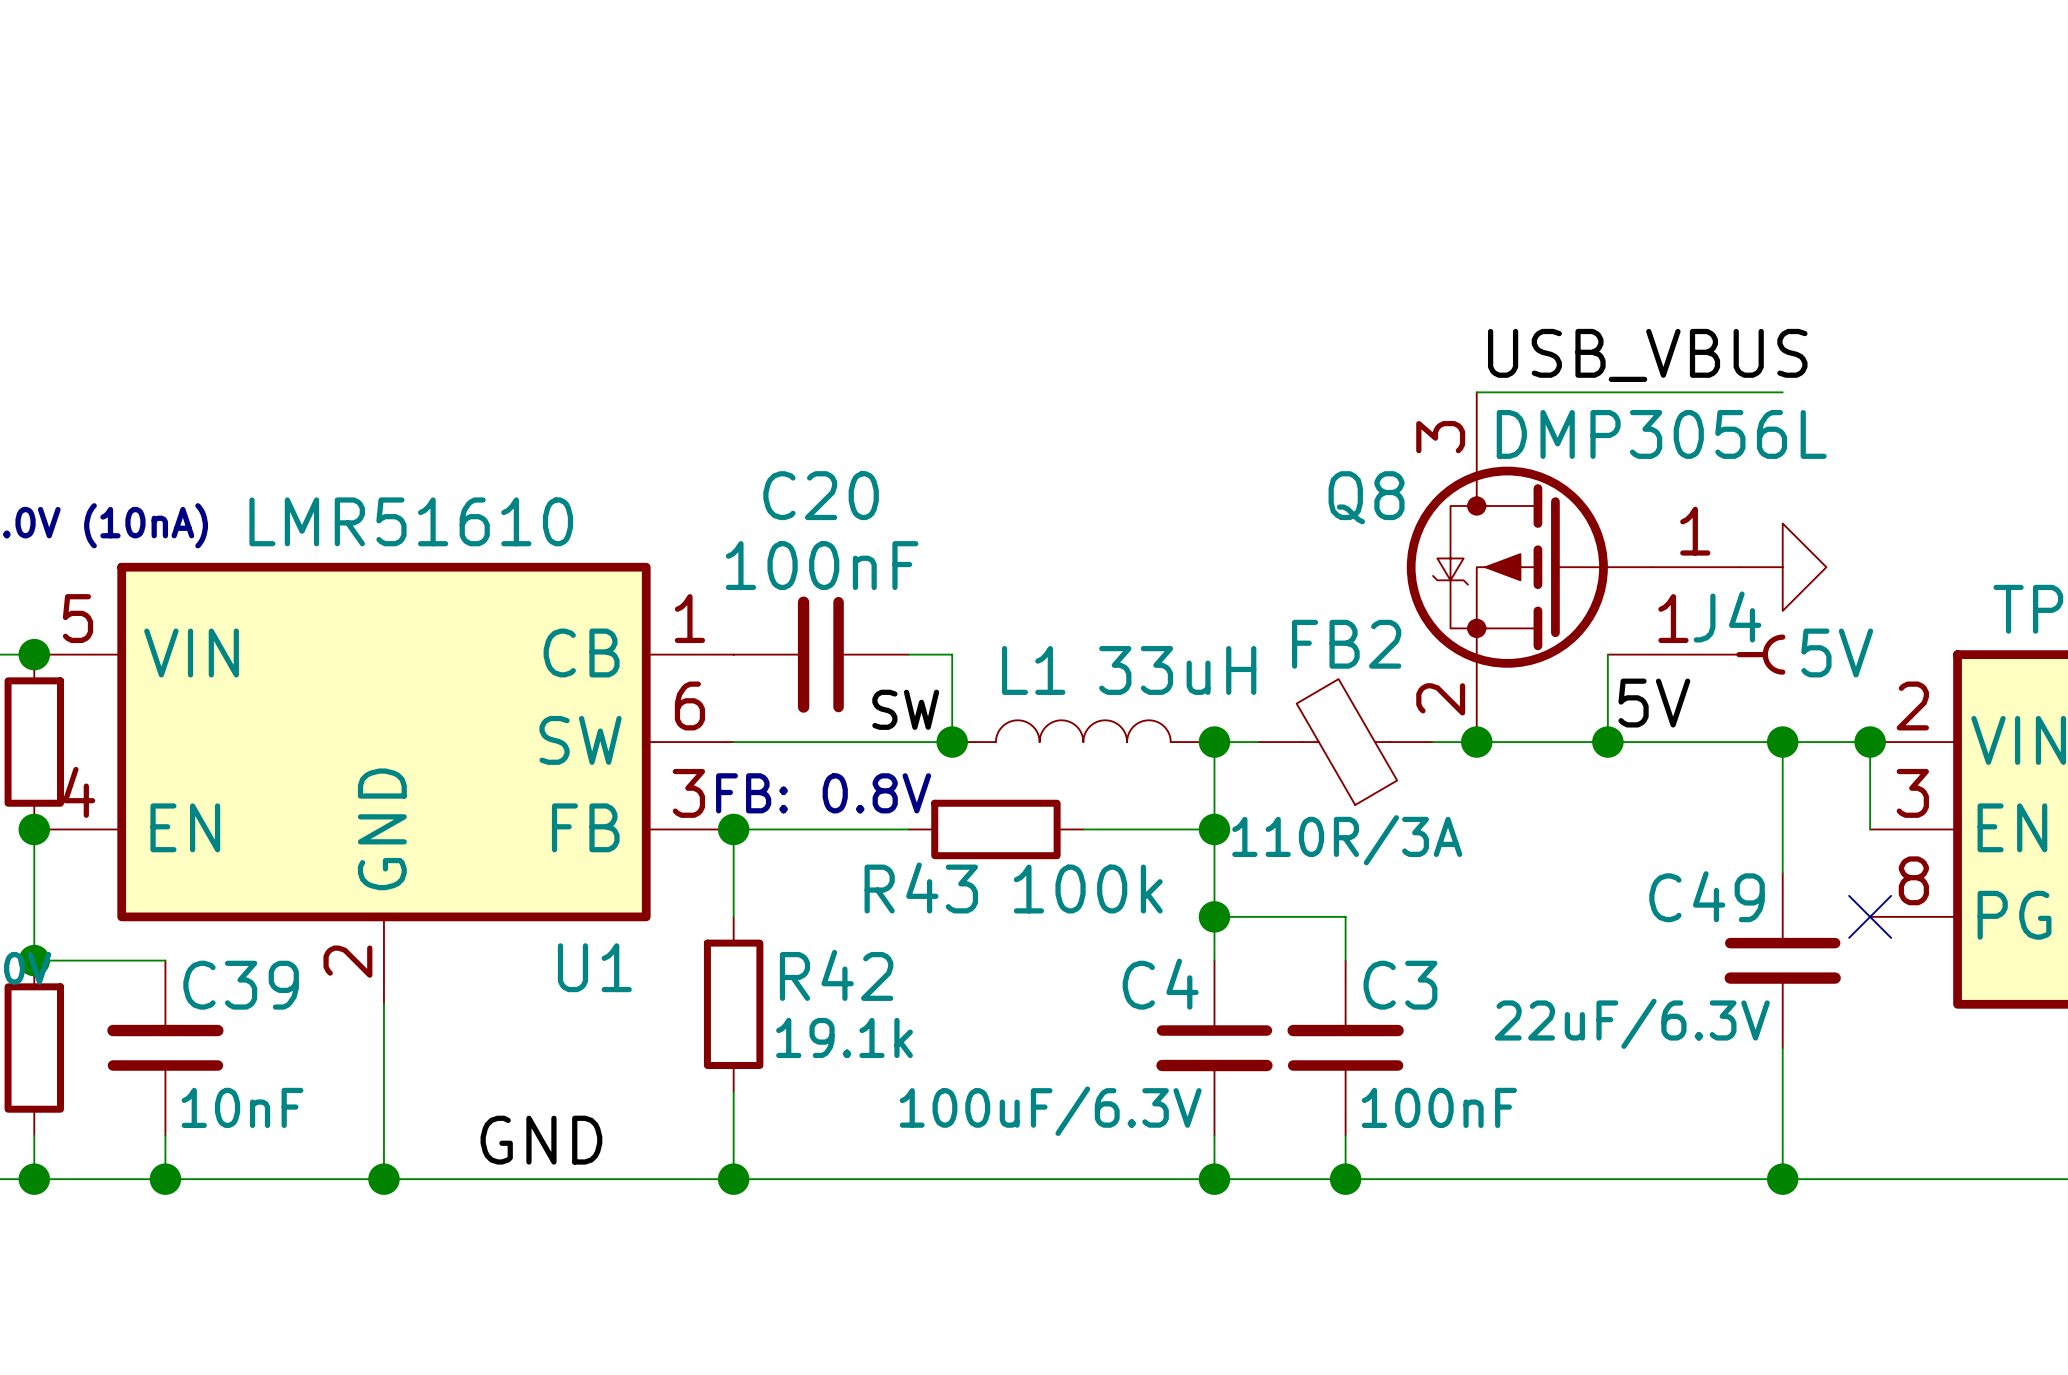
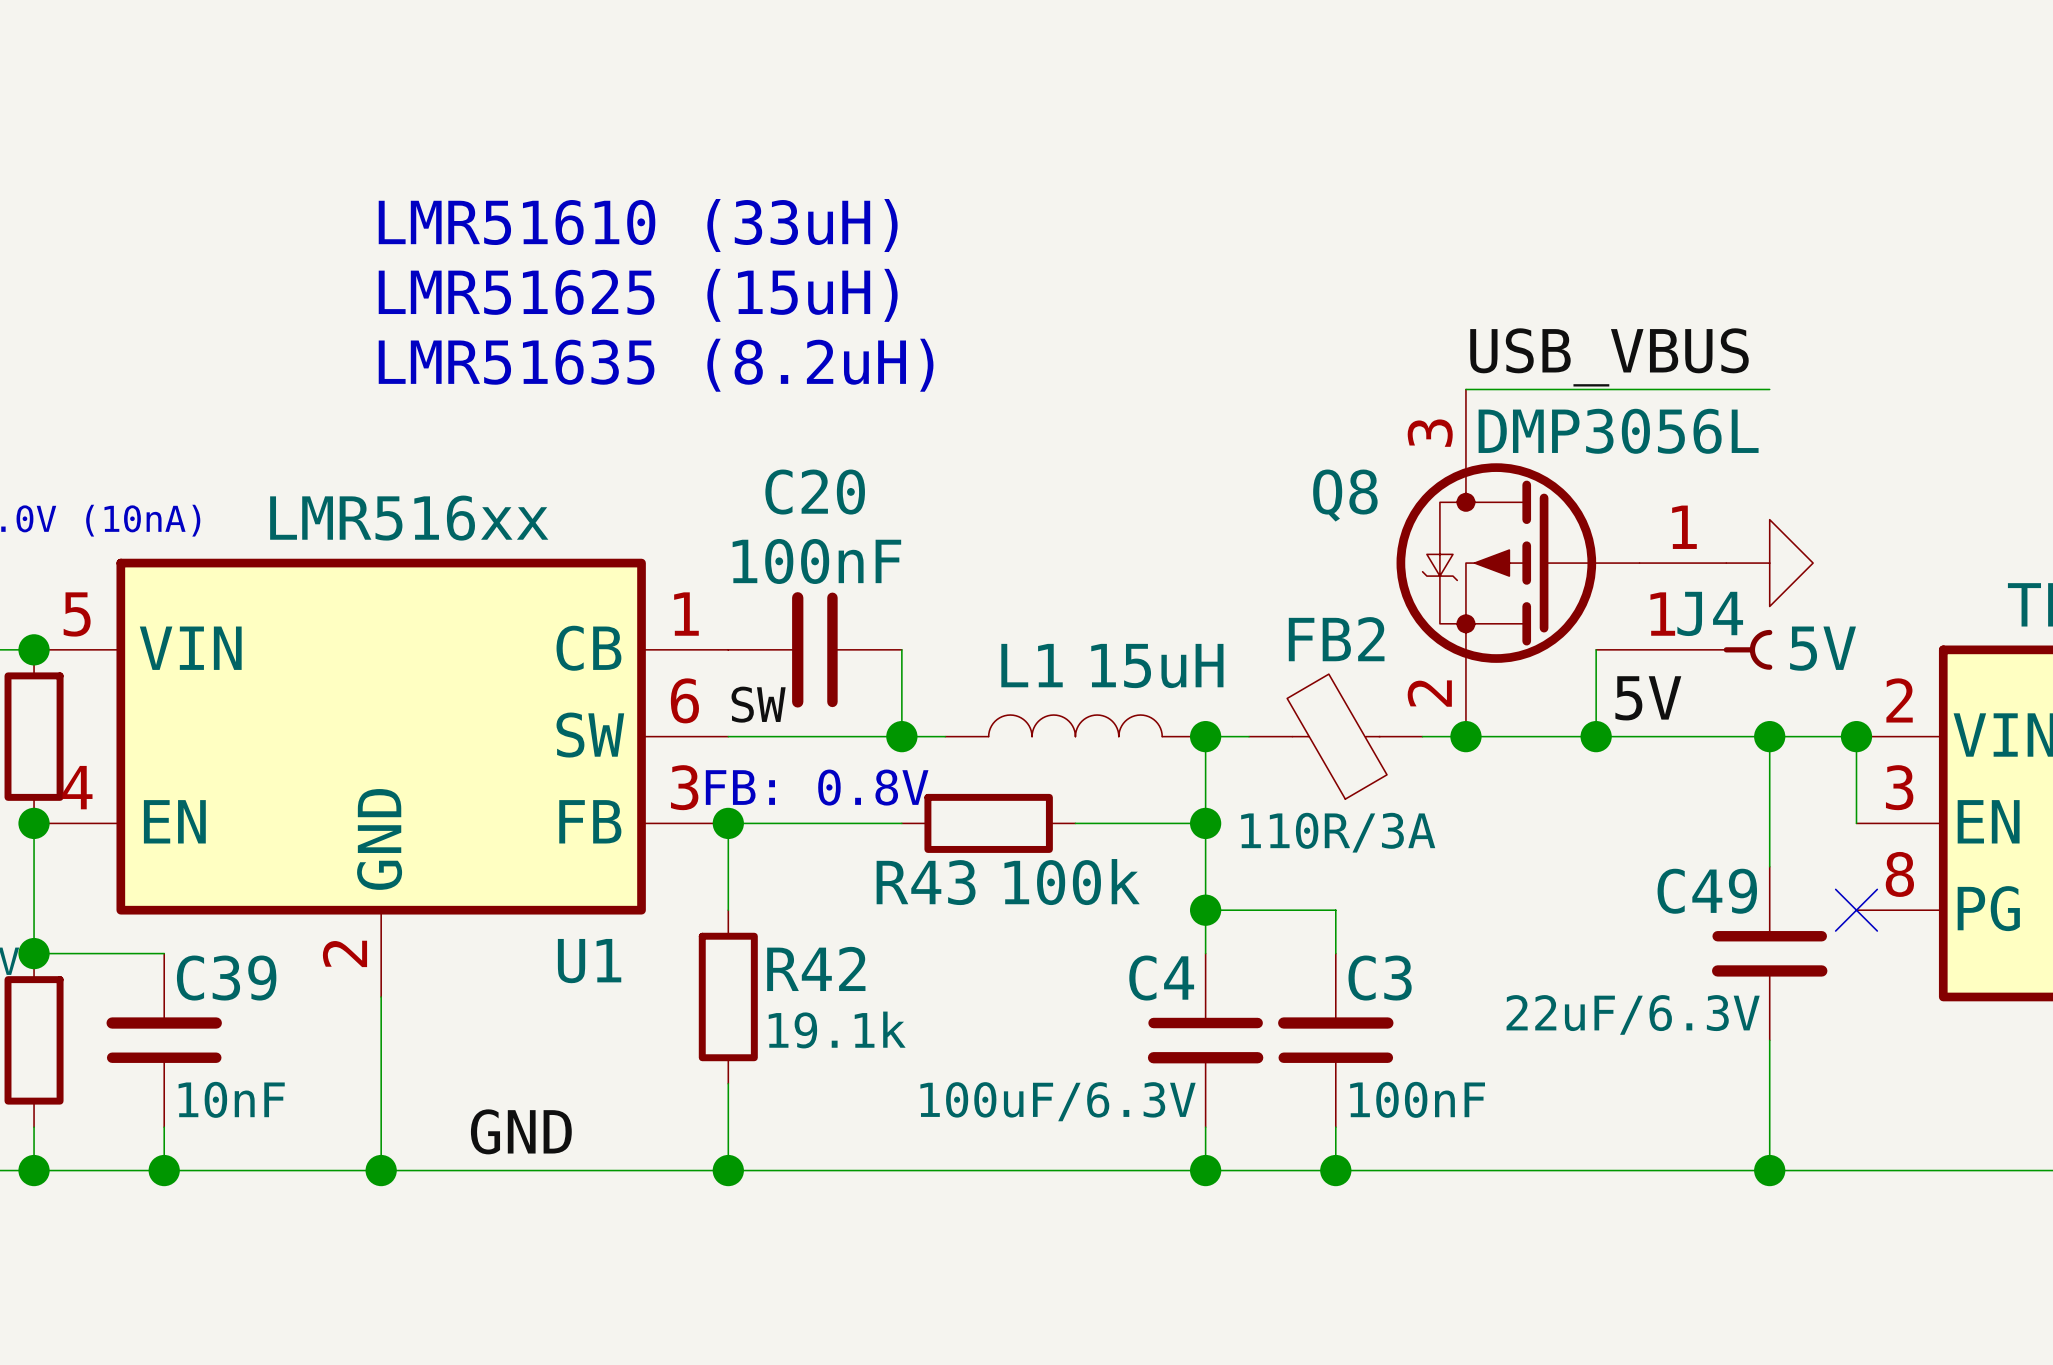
text: none -> LMR51610 (33uH) (638, 225)
text: none -> LMR51625 (15uH) (638, 295)
text: none -> LMR51635 (8.2uH) (656, 365)
U1 value: LMR51610 (411, 521) -> LMR516xx (409, 518)
wire: (908, 654) (952, 654) (952, 742) -> (901, 649) (901, 736)
L1 value: 33uH (1177, 670) -> 15uH (1157, 666)
label position: SW (905, 709) -> SW (758, 704)
junction position: (952, 742) -> (901, 736)

